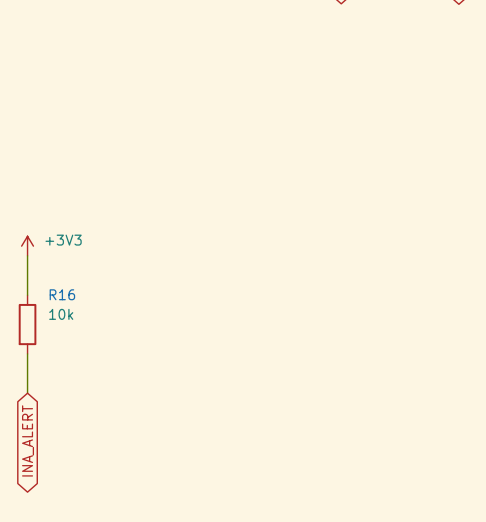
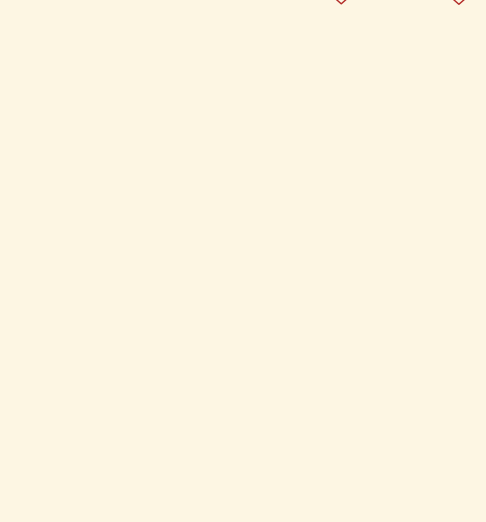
power symbol: +3V3 (27, 246) -> none
wire: (27, 255) (27, 295) -> none
R16: 10k (27, 324) -> none
wire: (27, 353) (27, 393) -> none
global label: INA_ALERT (28, 440) -> none

